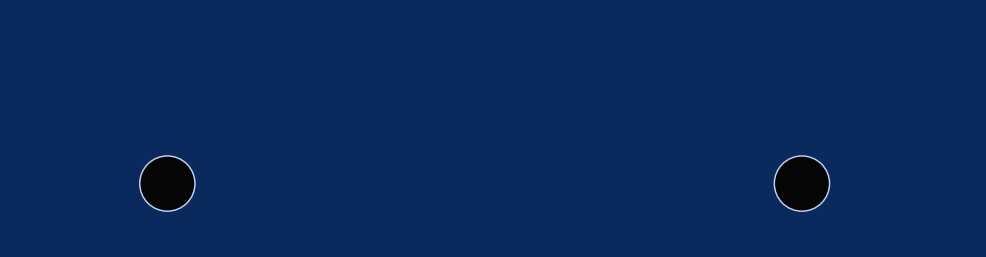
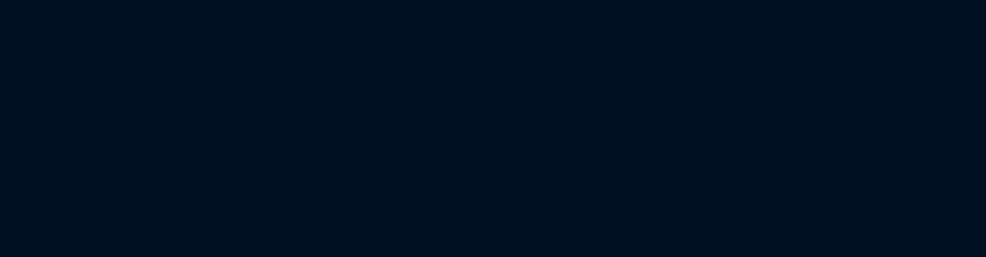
part: (167, 183) -> none
part: (801, 183) -> none

